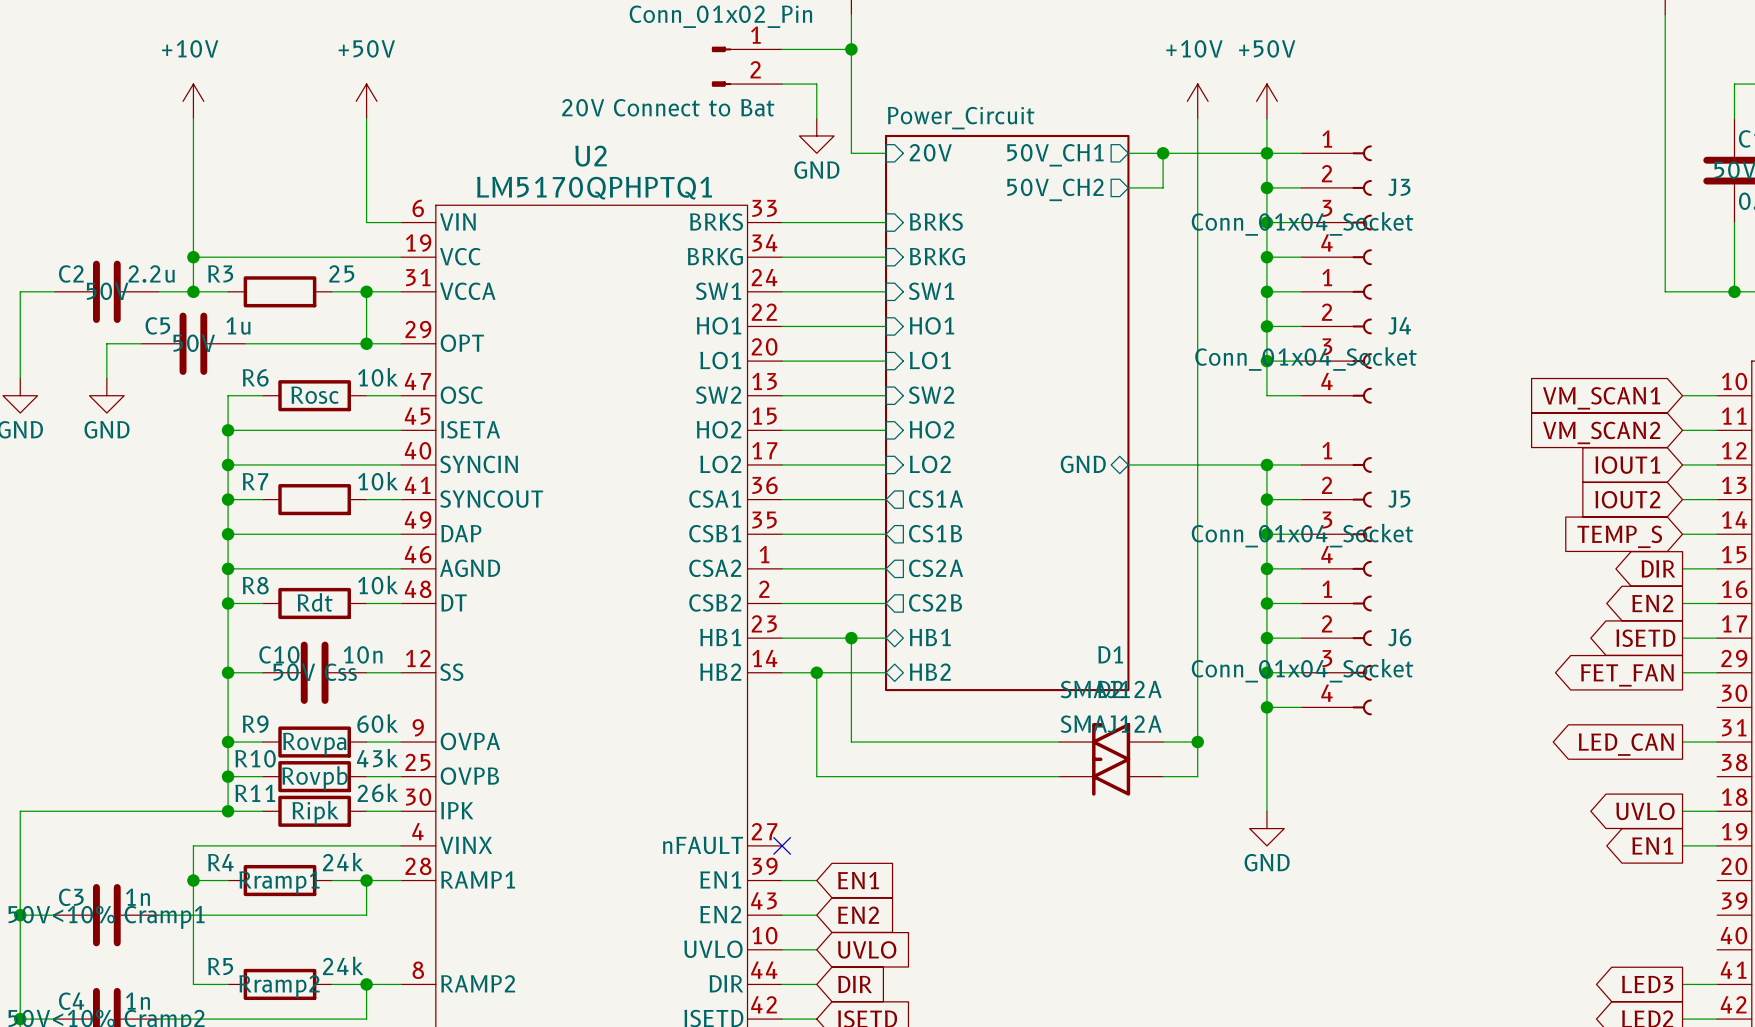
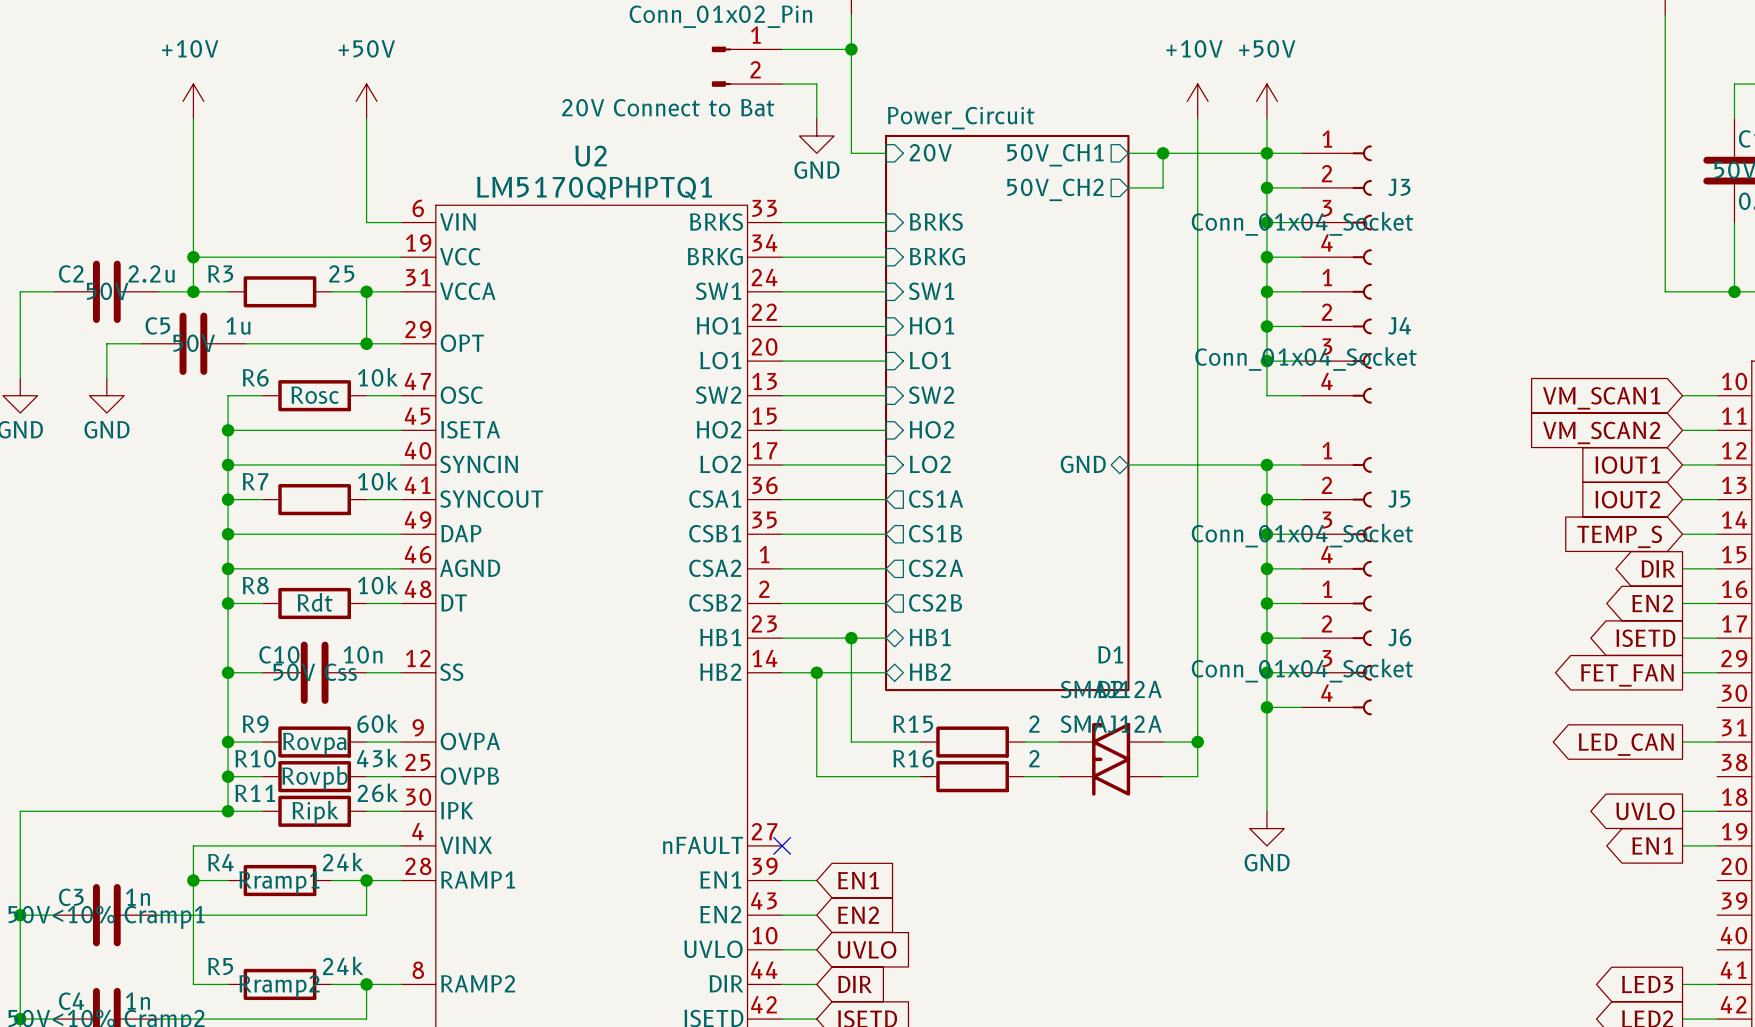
wire: (920, 742) (1024, 742) -> none
R15: none -> 2 (972, 742)
wire: (920, 776) (1024, 776) -> none
R16: none -> 2 (972, 776)

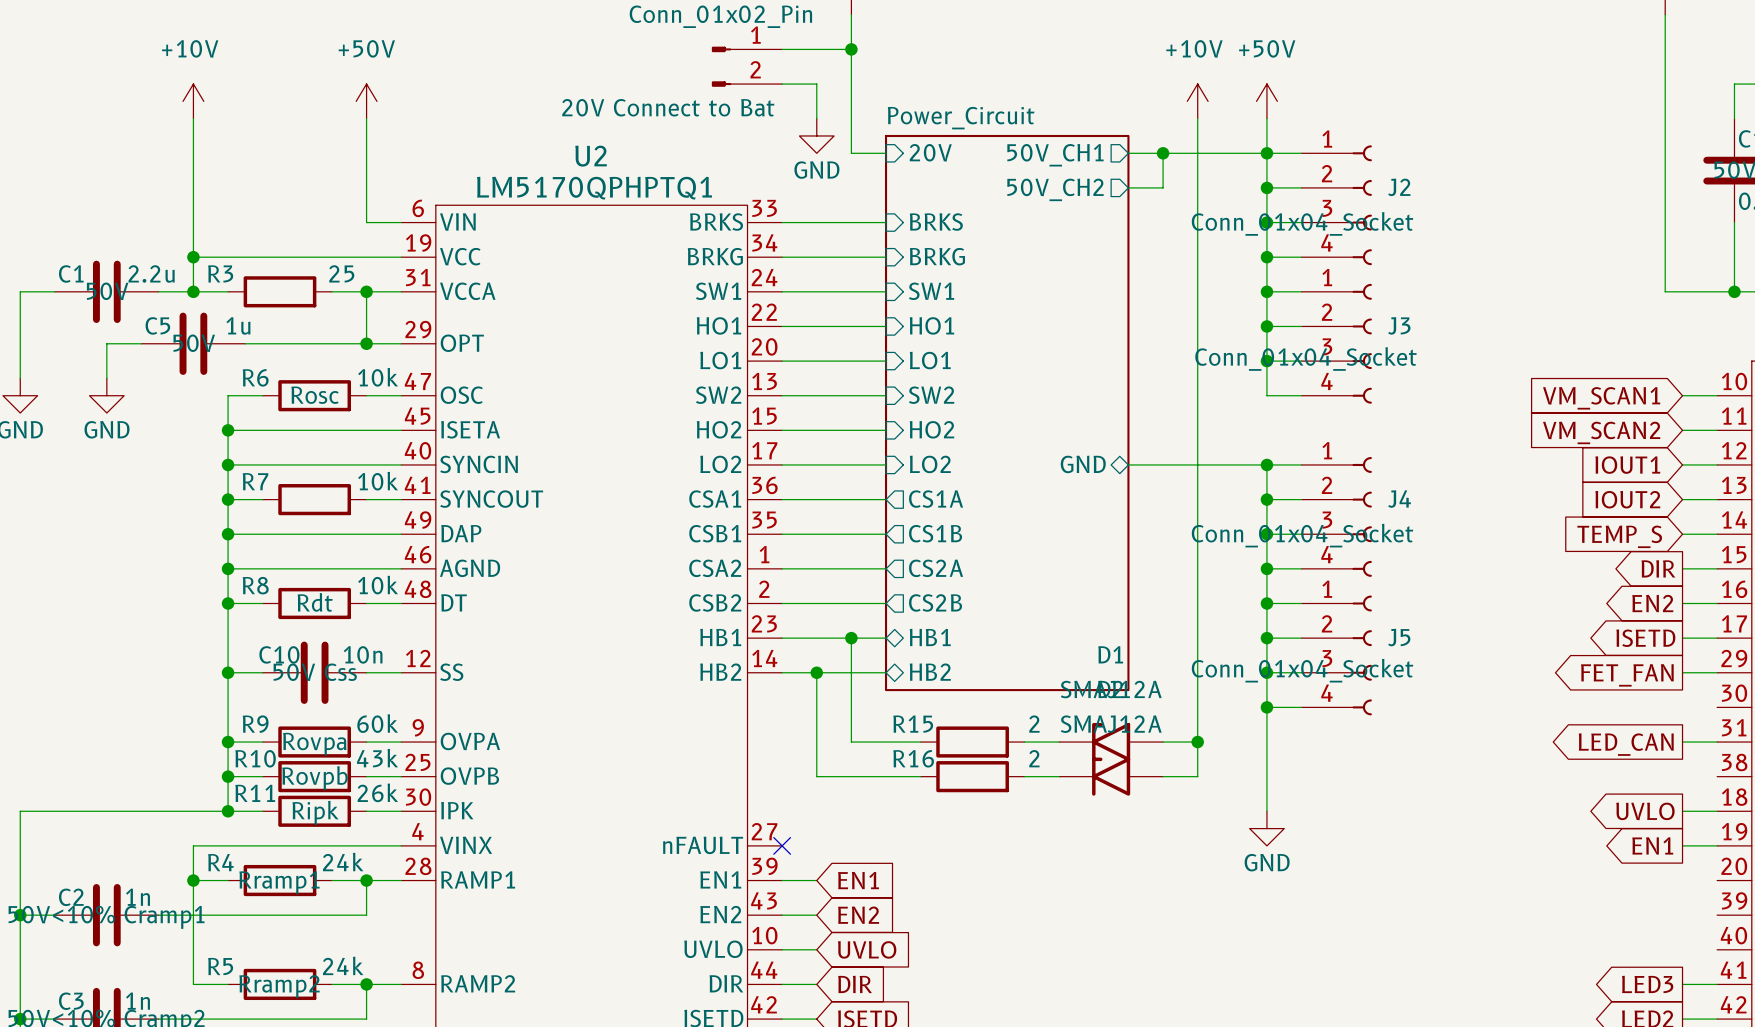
J3 name: J3 (1399, 187) -> J2 (1399, 187)
C2 name: C2 (71, 273) -> C1 (71, 273)
J4 name: J4 (1399, 325) -> J3 (1399, 325)
J5 name: J5 (1399, 499) -> J4 (1399, 499)
J6 name: J6 (1399, 637) -> J5 (1399, 637)
C3 name: C3 (71, 897) -> C2 (71, 897)
C4 name: C4 (71, 1001) -> C3 (71, 1001)

